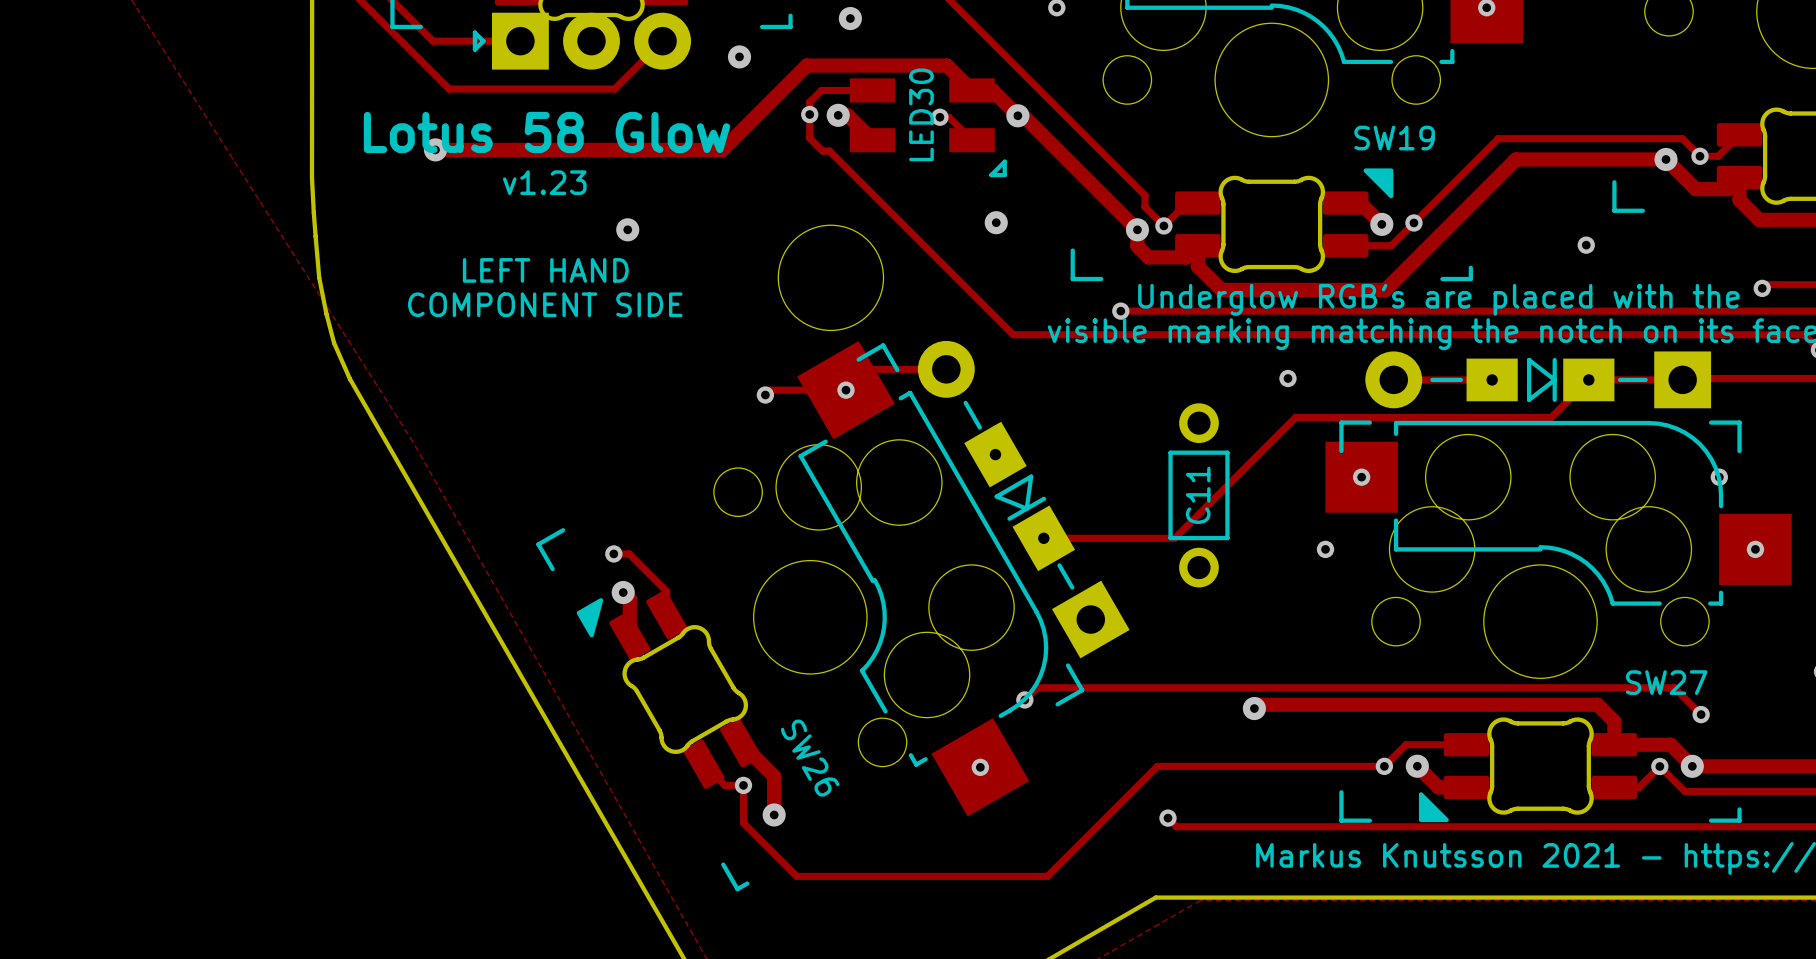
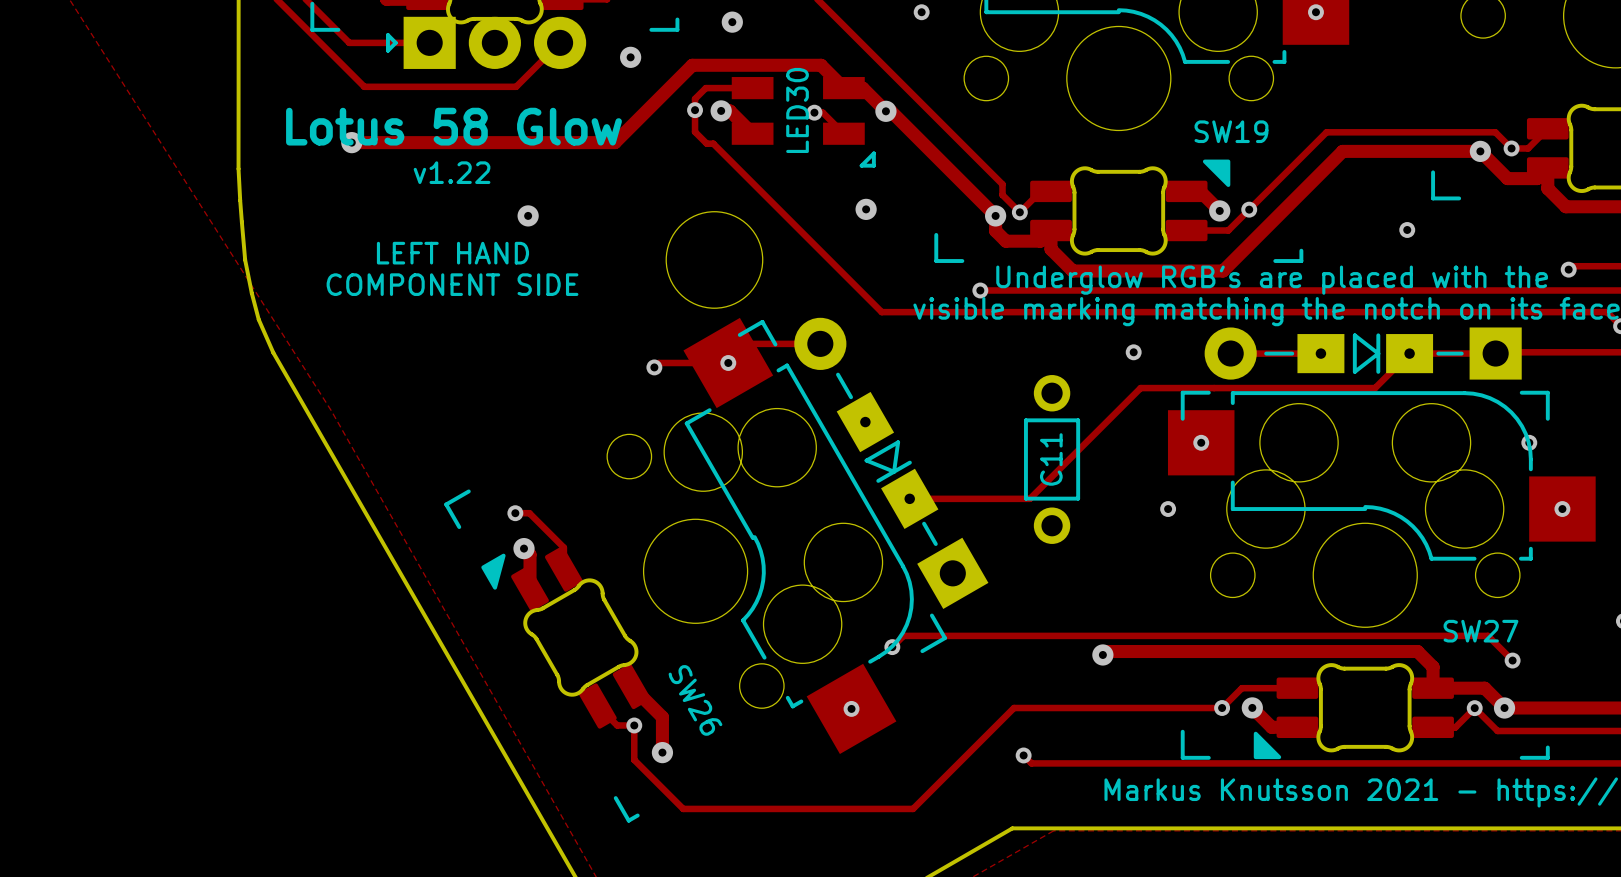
text: v1.23 (544, 182) -> v1.22 (452, 172)

